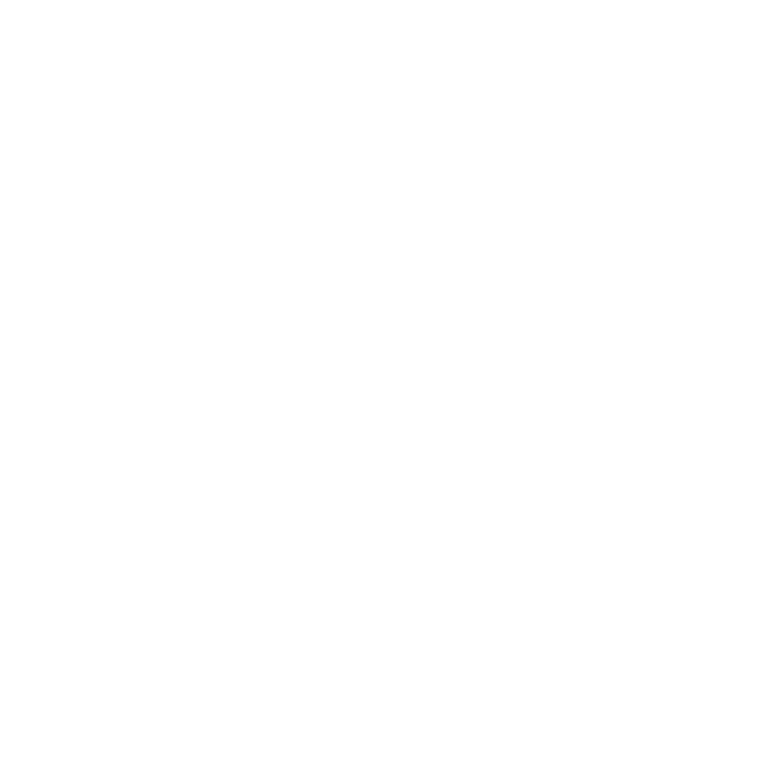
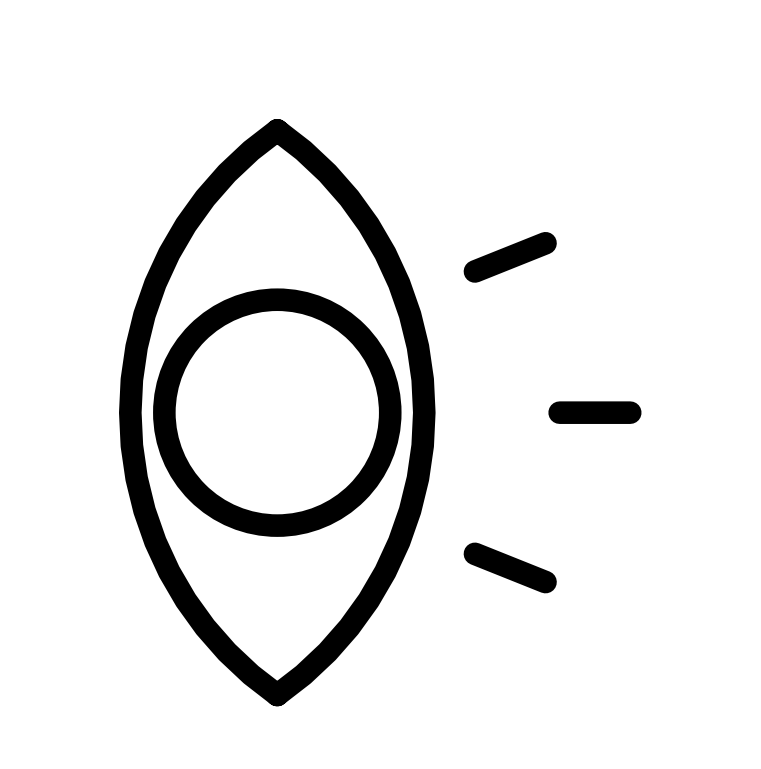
line: none -> (277, 130) (251, 150) (227, 173) (205, 198) (185, 224) (169, 253) (155, 283) (144, 314) (136, 346) (131, 379) (130, 412) (131, 445) (136, 478) (144, 510) (155, 541) (169, 571) (185, 600) (205, 627) (227, 652) (251, 674) (277, 695) (303, 674) (327, 652) (349, 627) (368, 600) (385, 571) (399, 541) (410, 510) (417, 478) (422, 445) (424, 412) (422, 379) (417, 346) (410, 314) (399, 283) (385, 253) (368, 224) (349, 198) (327, 173) (303, 150) (277, 130)
line: none -> (545, 243) (474, 271)
drawing: none -> [153, 288, 402, 537]
line: none -> (559, 412) (630, 412)
line: none -> (474, 553) (545, 582)

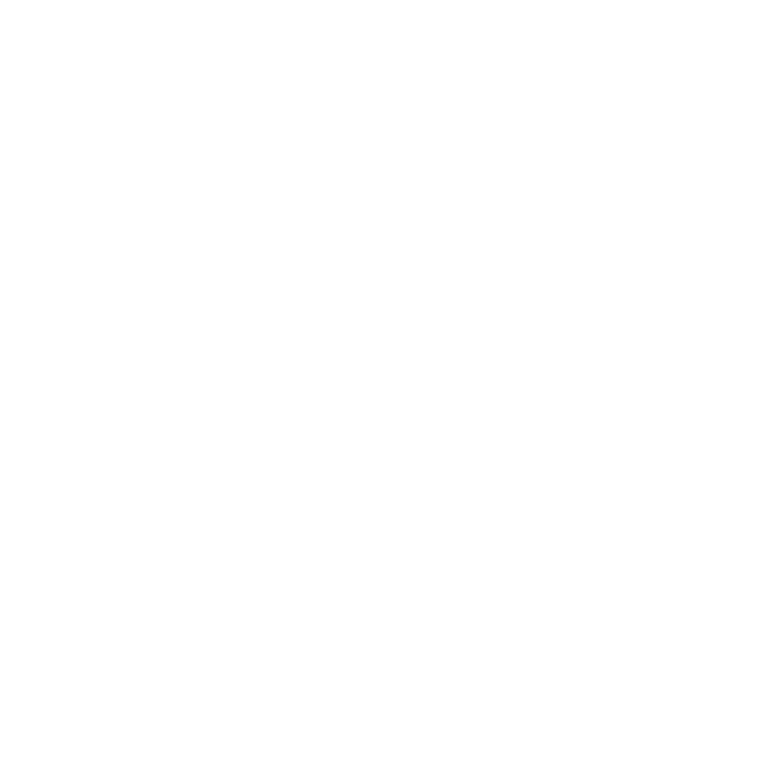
line: (277, 130) (251, 150) (227, 173) (205, 198) (185, 224) (169, 253) (155, 283) (144, 314) (136, 346) (131, 379) (130, 412) (131, 445) (136, 478) (144, 510) (155, 541) (169, 571) (185, 600) (205, 627) (227, 652) (251, 674) (277, 695) (303, 674) (327, 652) (349, 627) (368, 600) (385, 571) (399, 541) (410, 510) (417, 478) (422, 445) (424, 412) (422, 379) (417, 346) (410, 314) (399, 283) (385, 253) (368, 224) (349, 198) (327, 173) (303, 150) (277, 130) -> none
line: (545, 243) (474, 271) -> none
drawing: [153, 288, 402, 537] -> none
line: (559, 412) (630, 412) -> none
line: (474, 553) (545, 582) -> none

